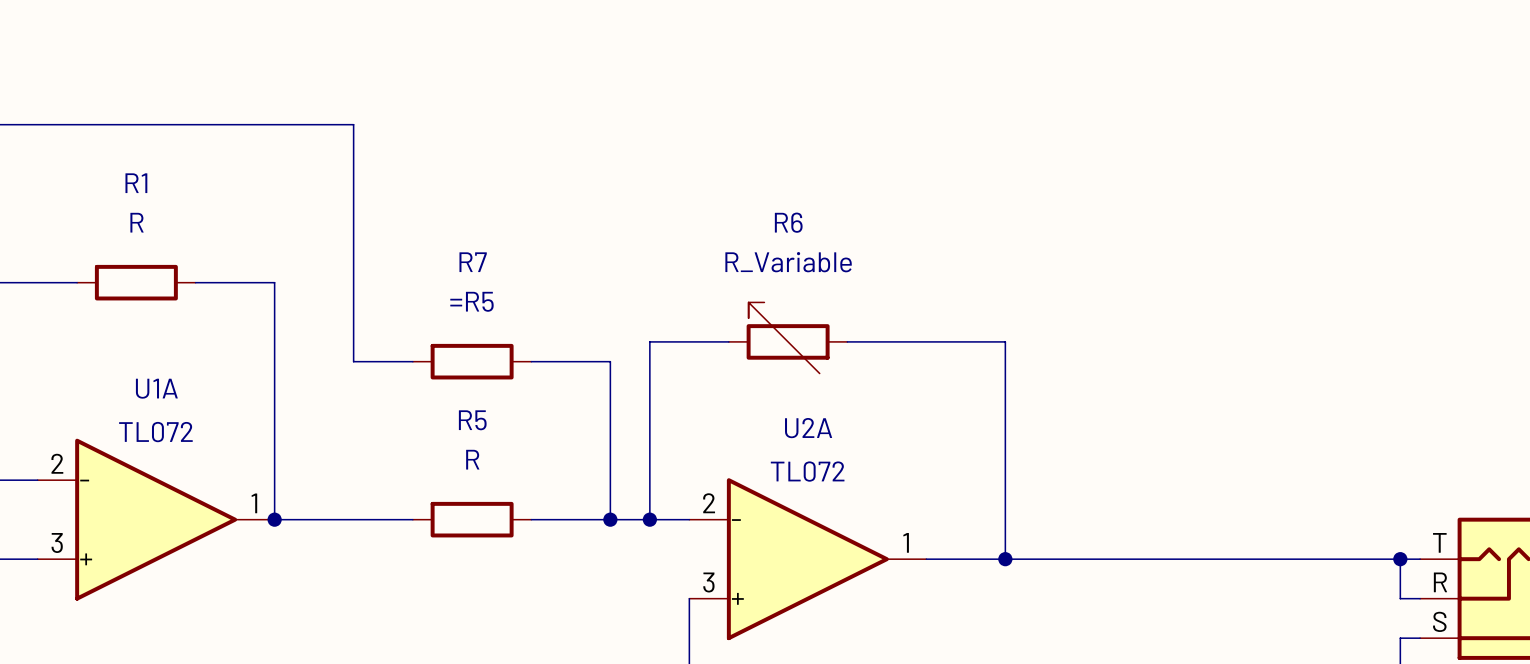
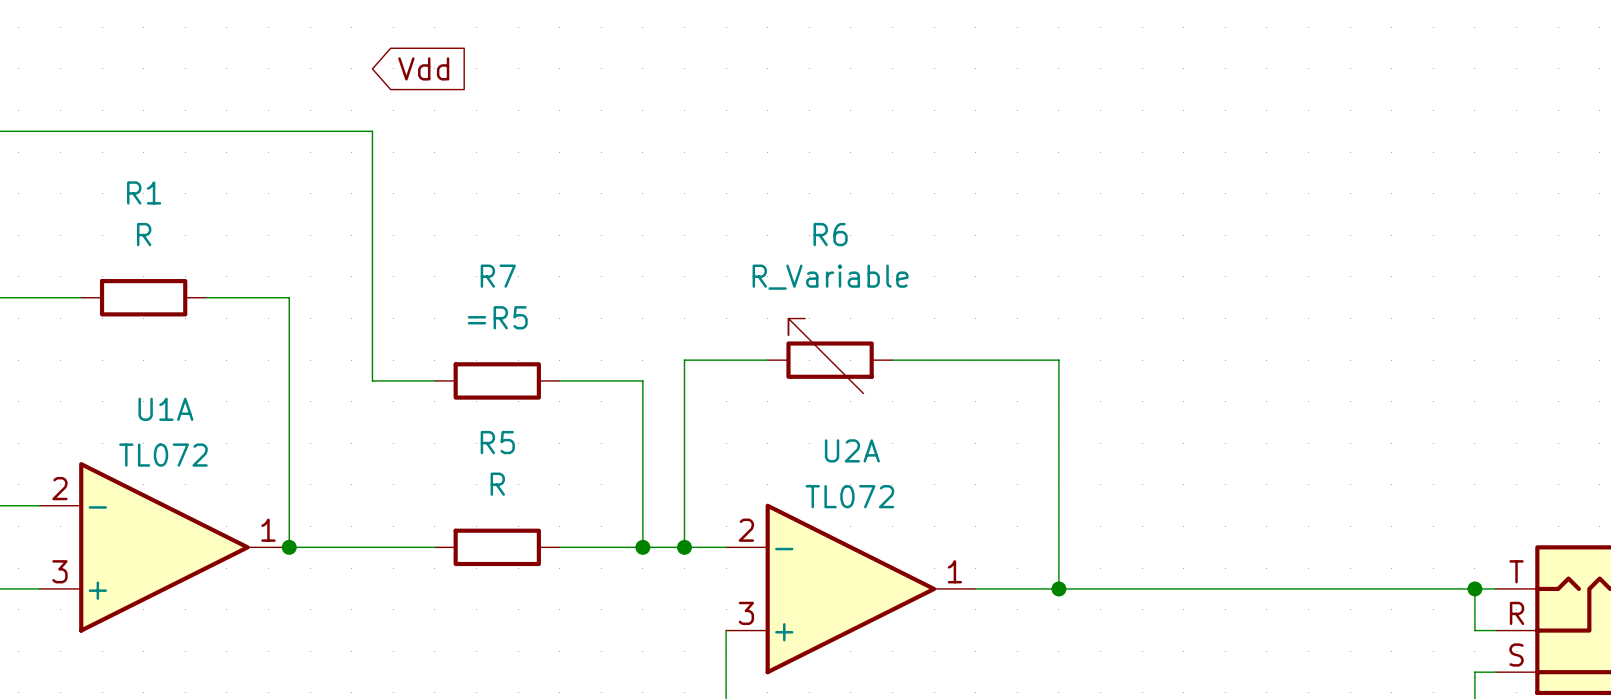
global label: none -> Vdd (423, 68)

